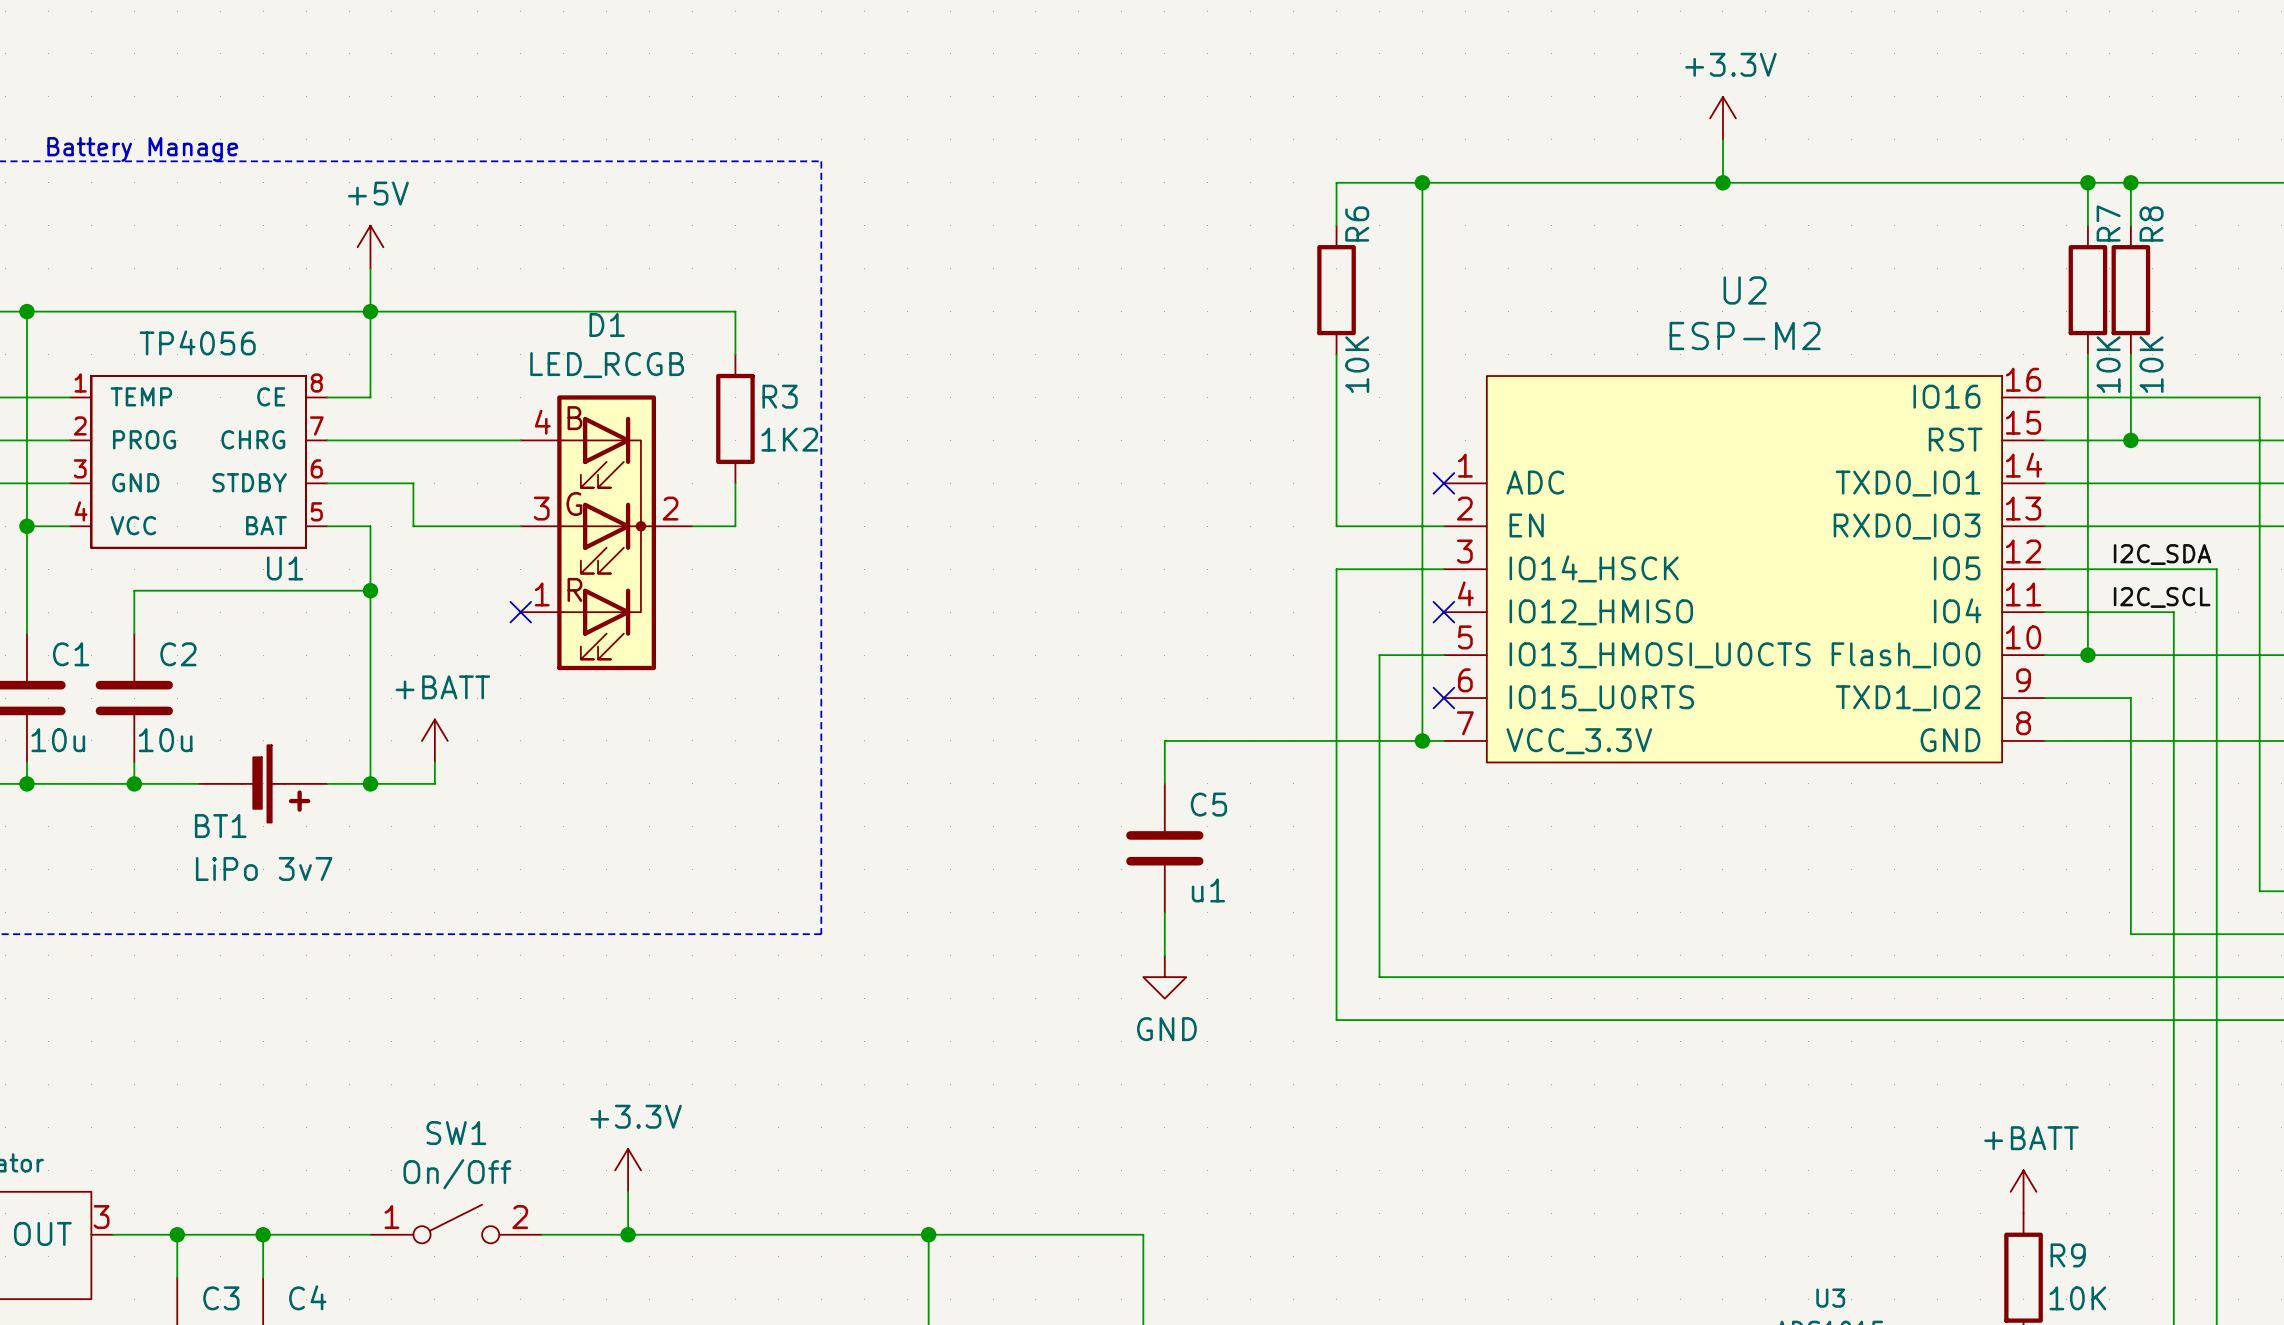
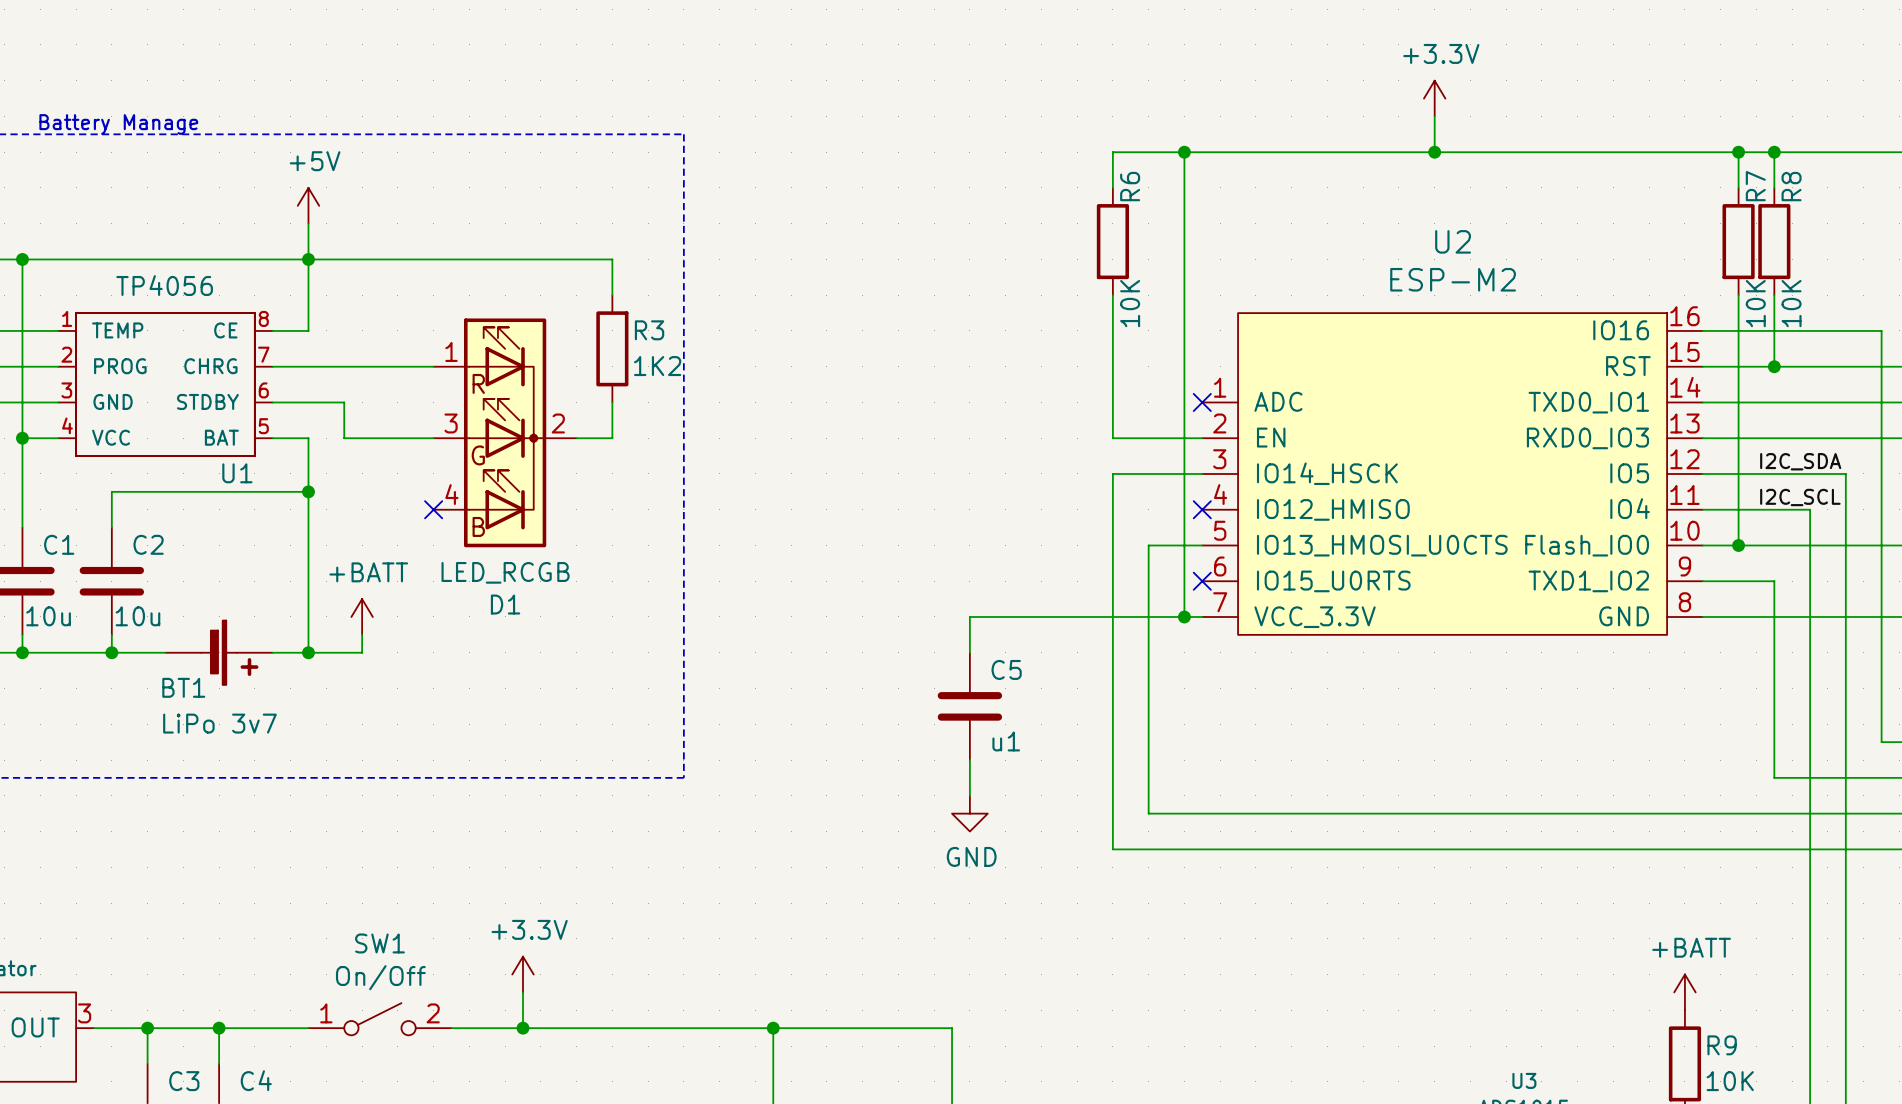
D1 flip: as is (606, 532) -> up-down (505, 432)

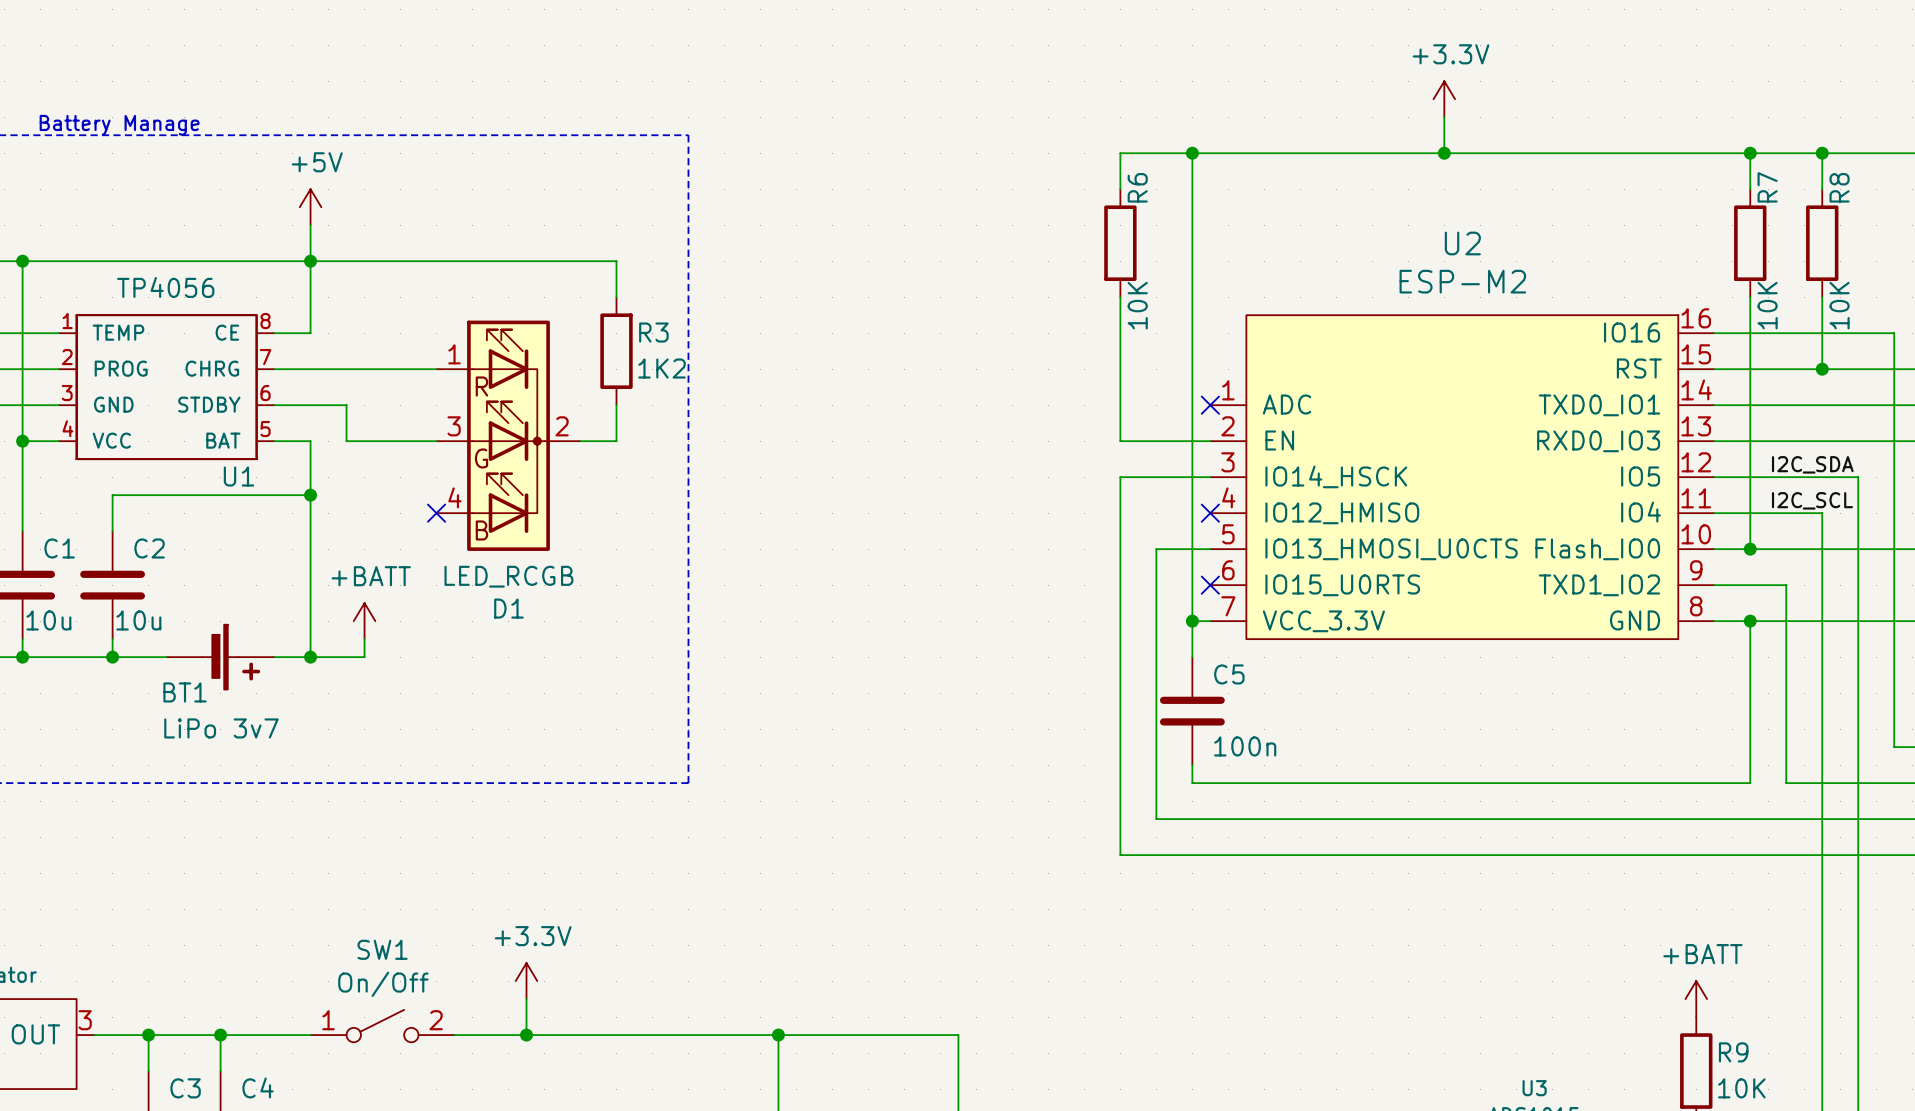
wire: (1774, 152) (1774, 187) -> (1822, 153) (1822, 189)
junction position: (1774, 152) -> (1822, 153)
R8 position: (1774, 241) -> (1822, 243)
wire: (1774, 295) (1774, 366) -> (1822, 297) (1822, 369)
junction position: (1774, 366) -> (1822, 369)
wire: (1184, 616) (969, 616) (969, 652) -> (1192, 621) (1192, 657)
wire: none -> (1750, 621) (1750, 783) (1192, 783) (1192, 765)
junction: none -> (1750, 621)
C5 position: (969, 706) -> (1192, 711)
C5 value: u1 (1006, 741) -> 100n (1245, 746)
wire: (969, 760) (969, 795) -> none
power symbol: GND (969, 813) -> none

